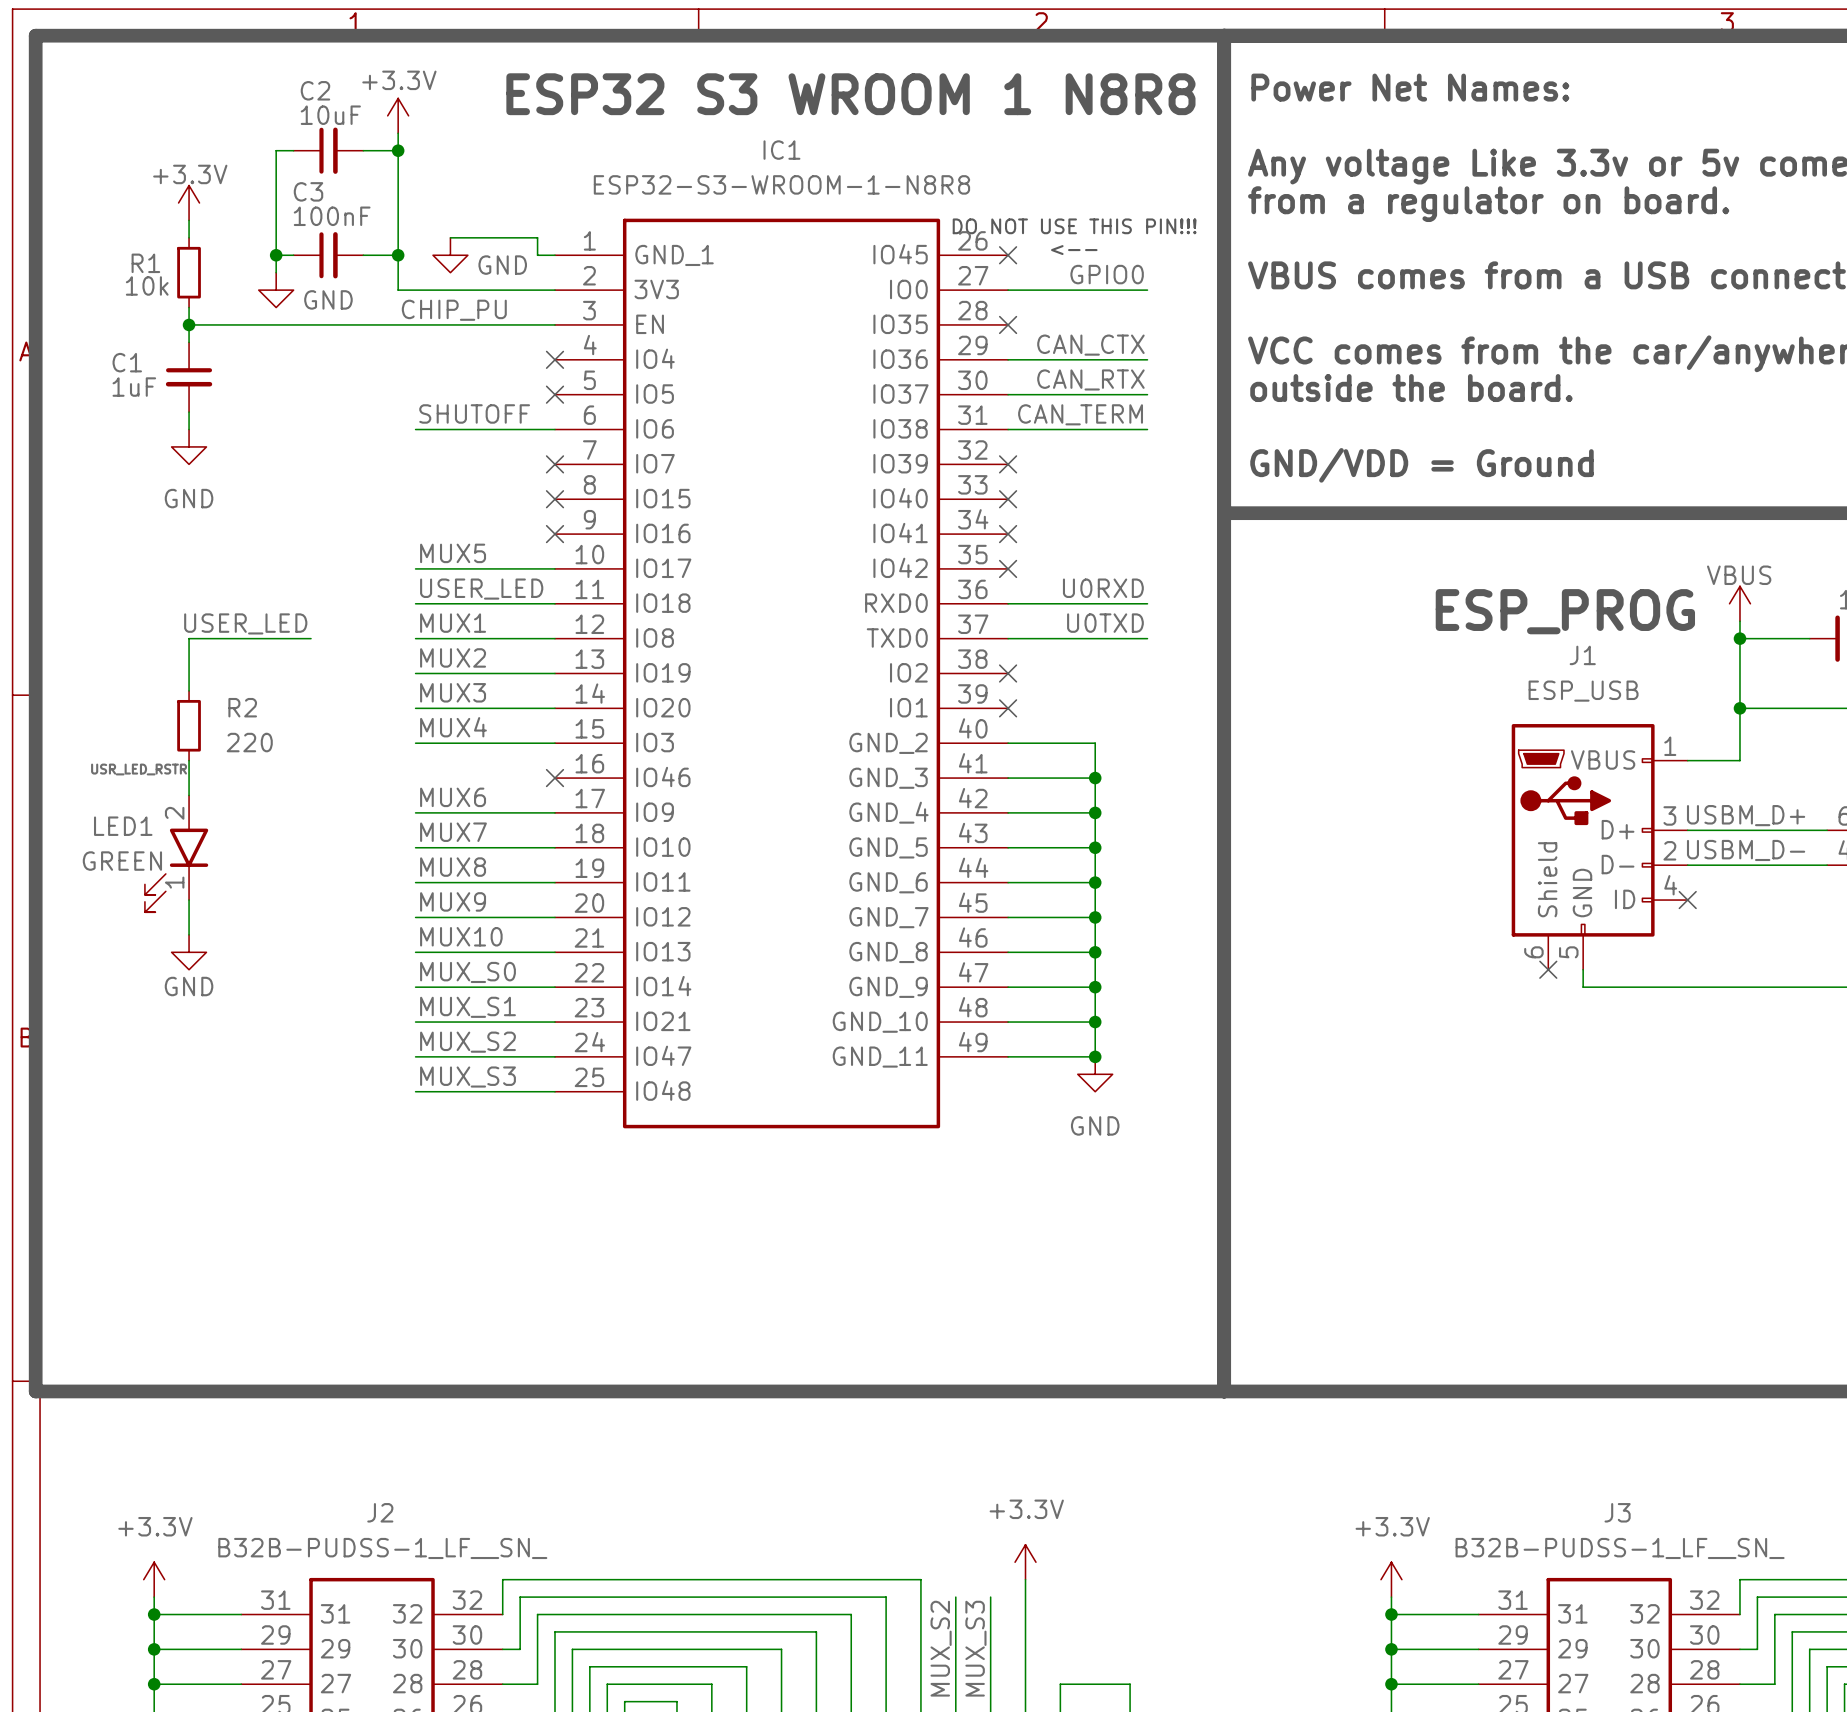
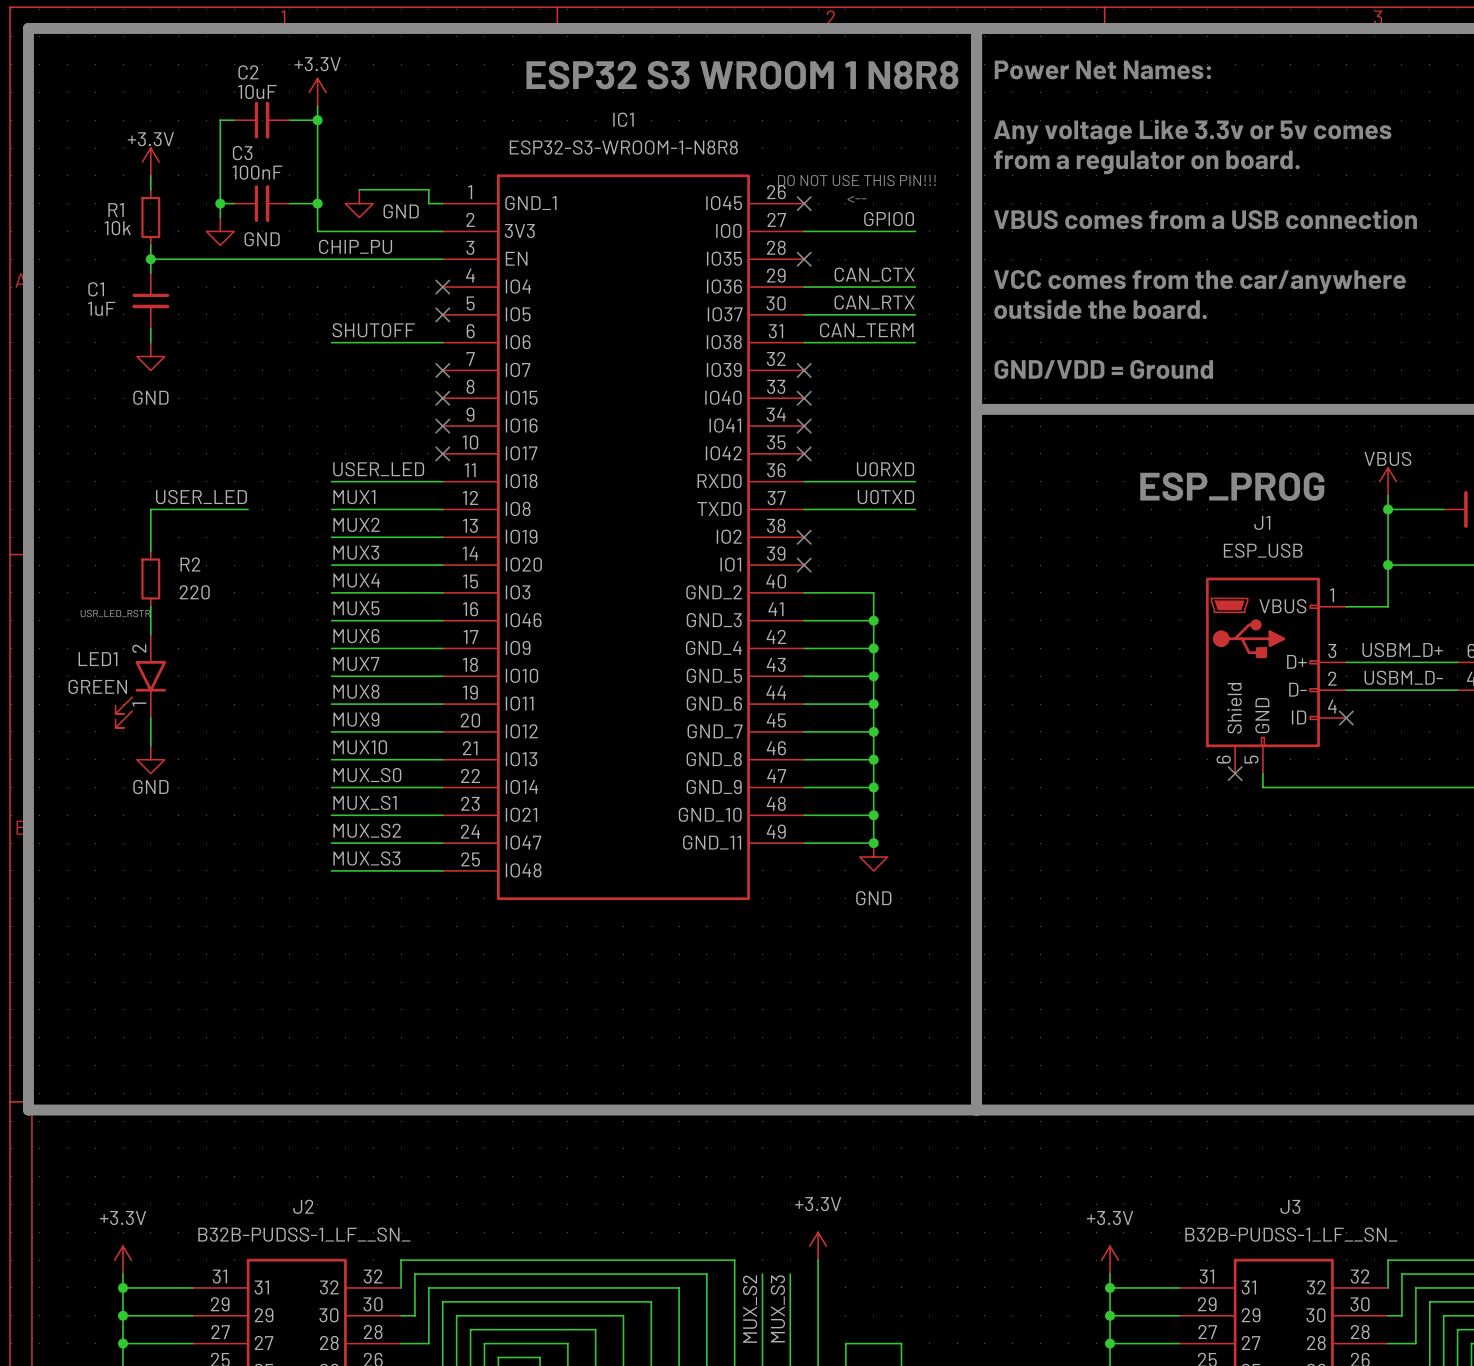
label position: MUX5 (453, 553) -> MUX5 (356, 608)
wire: (415, 568) (554, 568) -> (331, 620) (442, 620)
no-connect mark: none -> (442, 453)
no-connect mark: (554, 778) -> none

